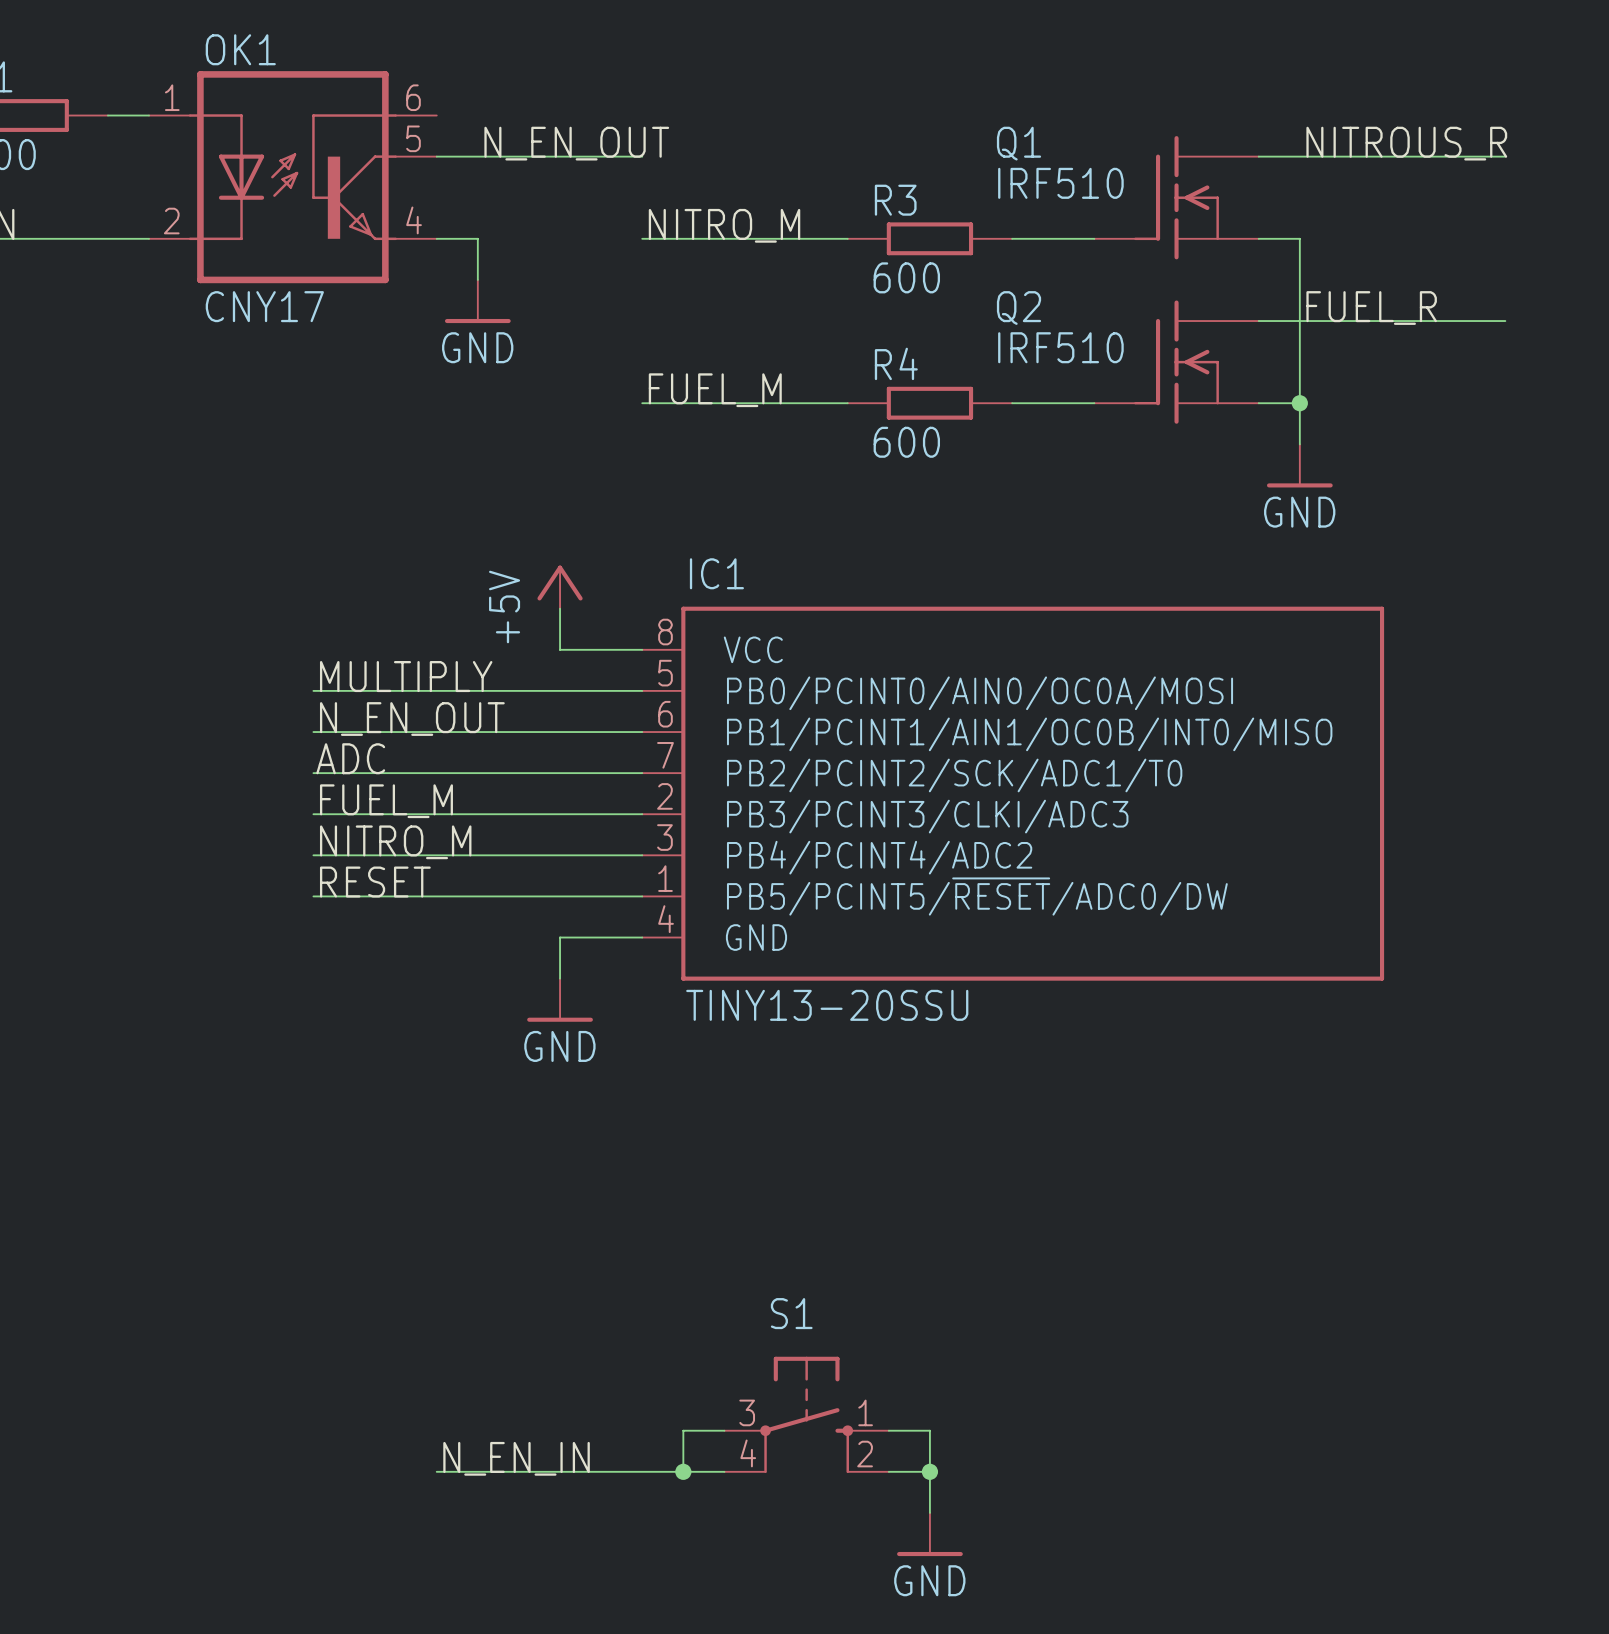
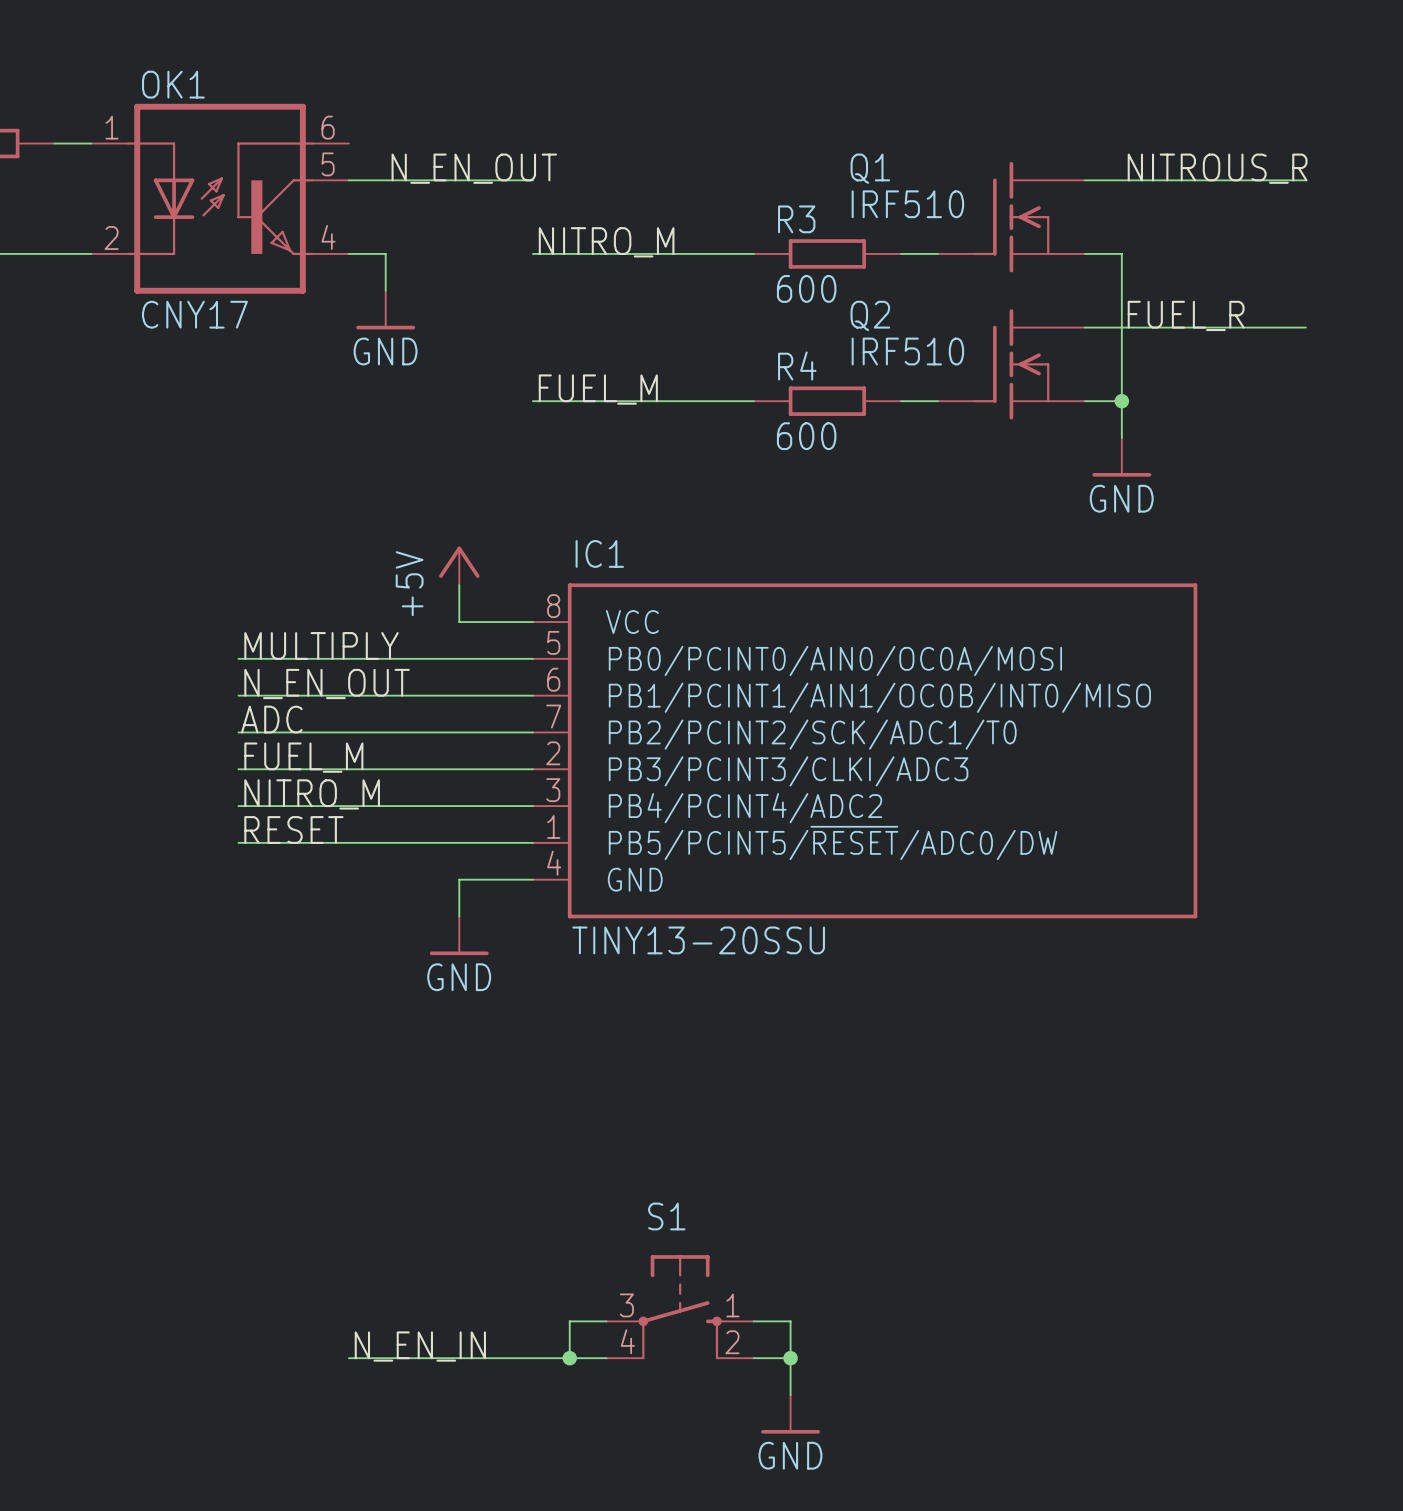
R3 position: (929, 238) -> (827, 253)
R4 position: (929, 403) -> (827, 401)

